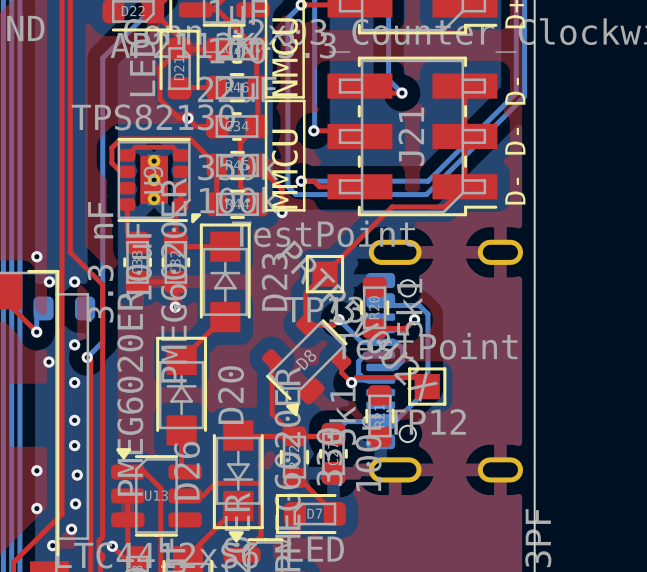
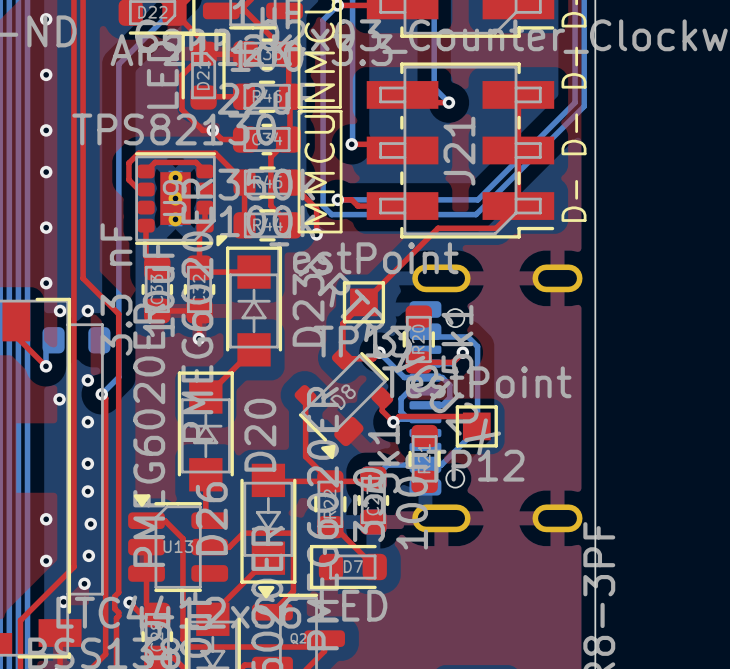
via: none -> (46, 19)
via: none -> (46, 74)
via: none -> (46, 130)
via: none -> (46, 172)
via: none -> (46, 227)

